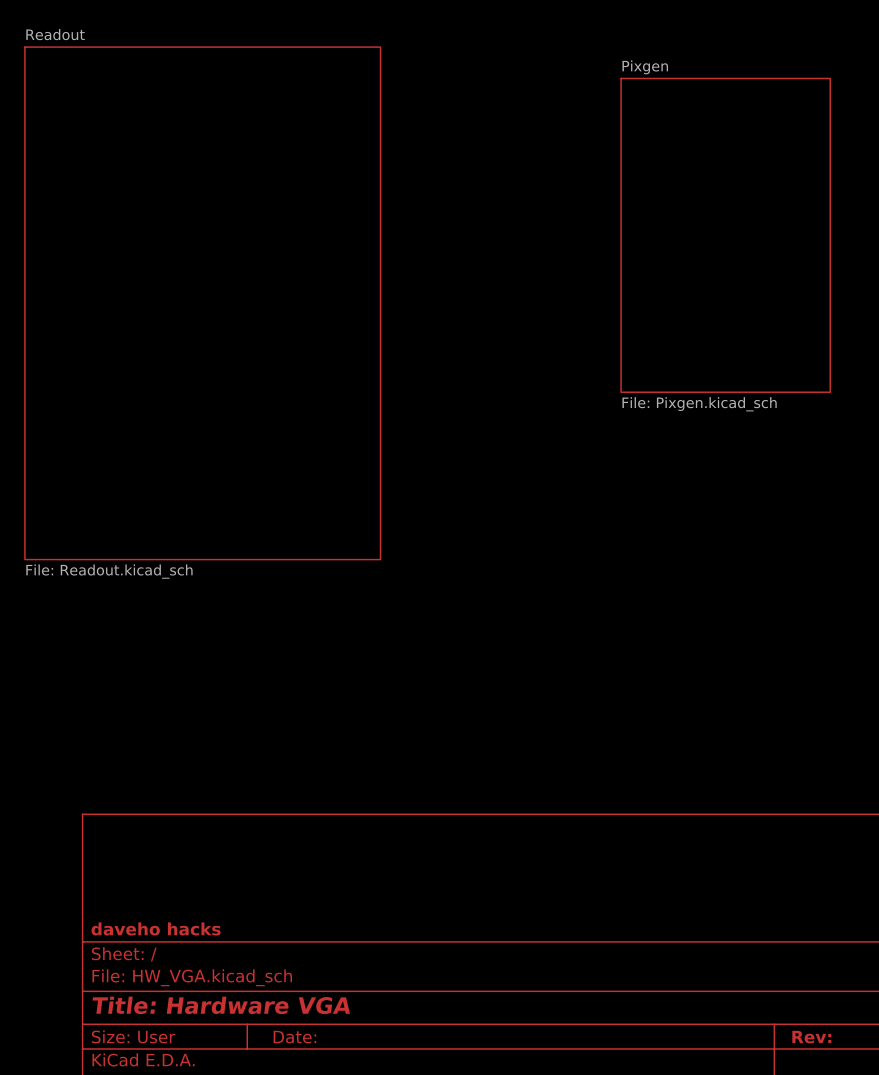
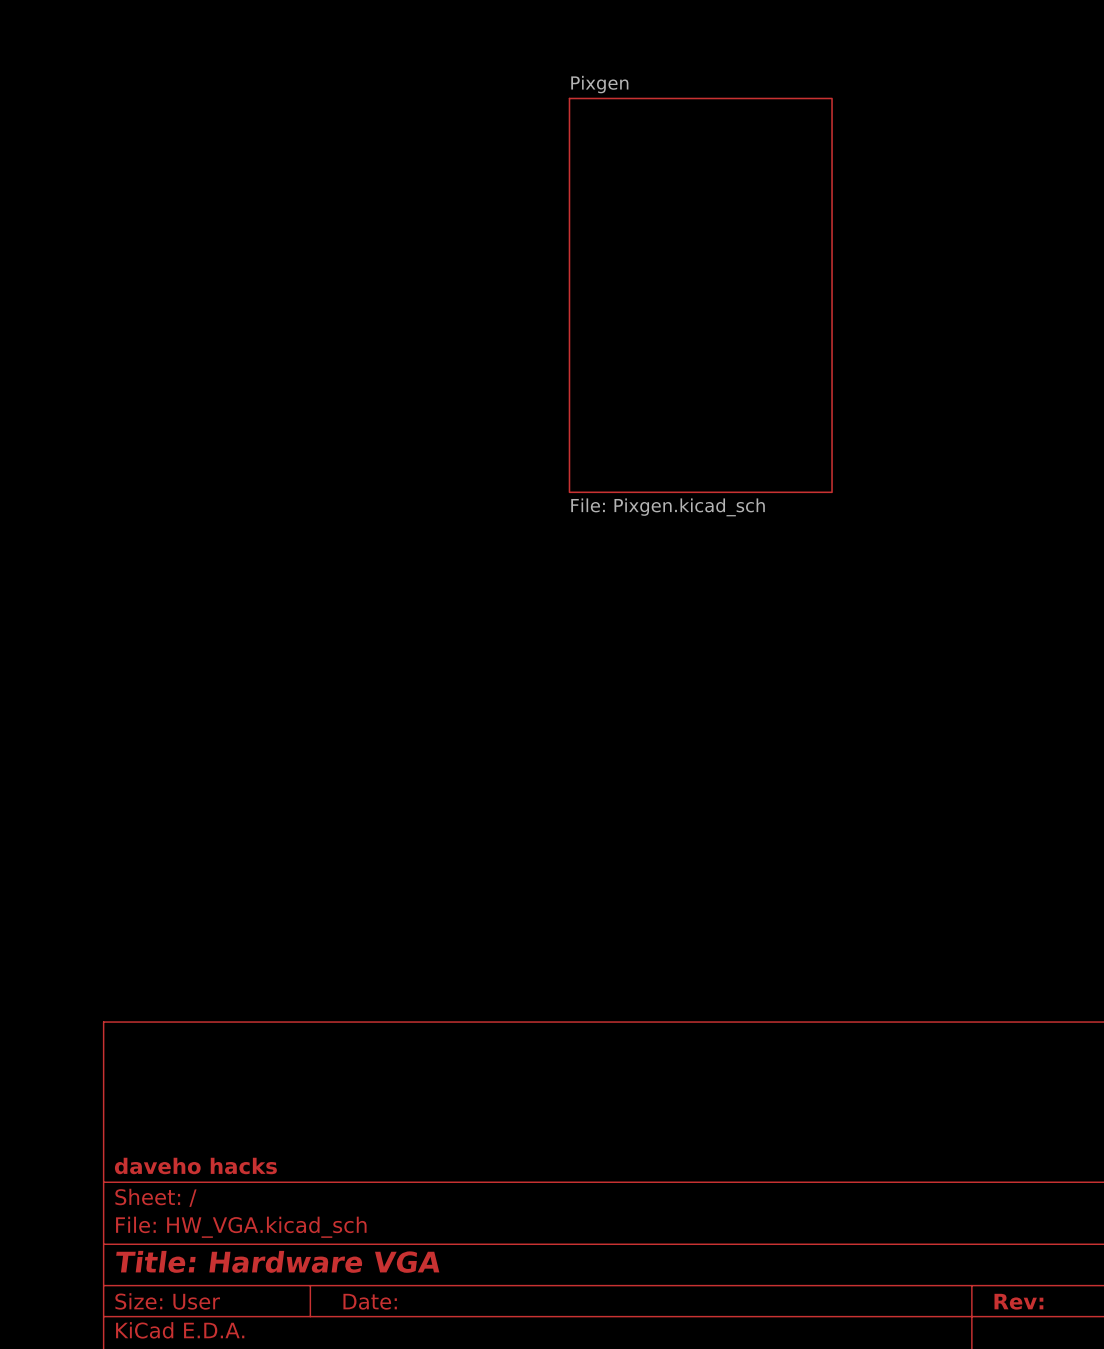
sheet Pixgen position: (725, 235) -> (700, 295)
sheet Readout: File: Readout.kicad_sch (202, 303) -> none

